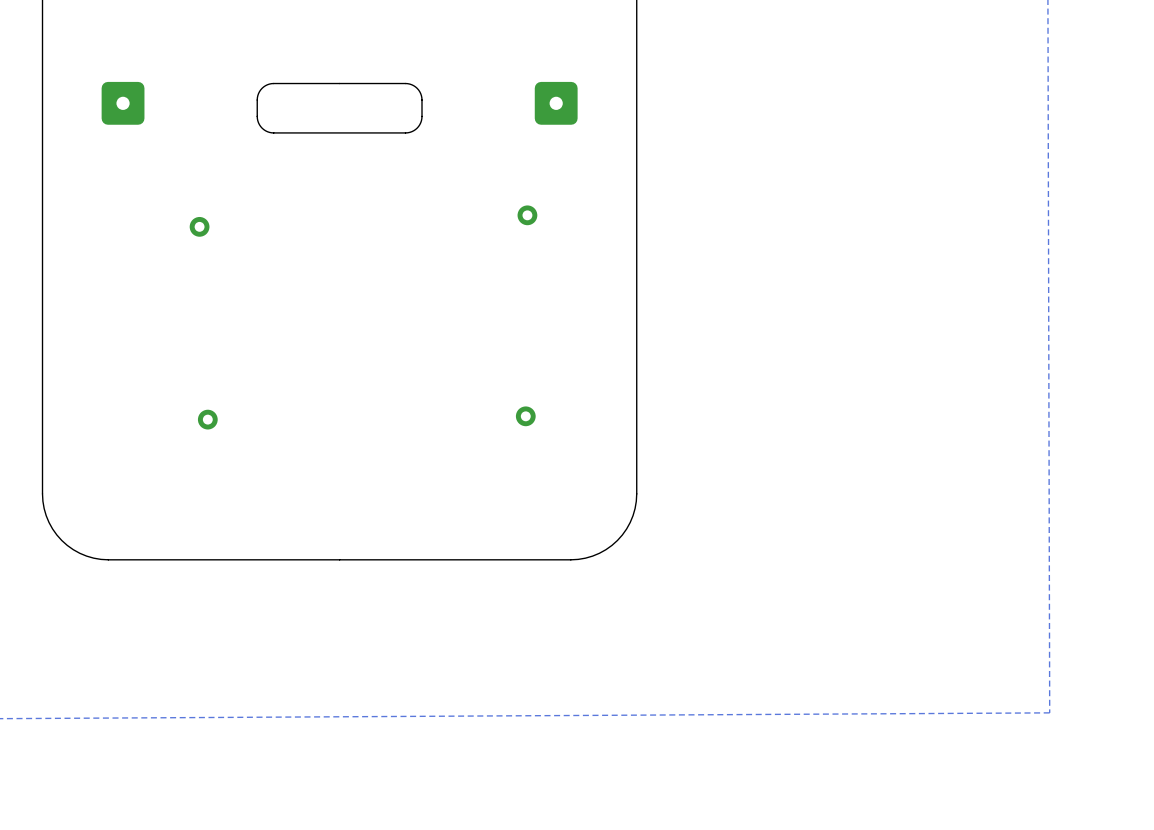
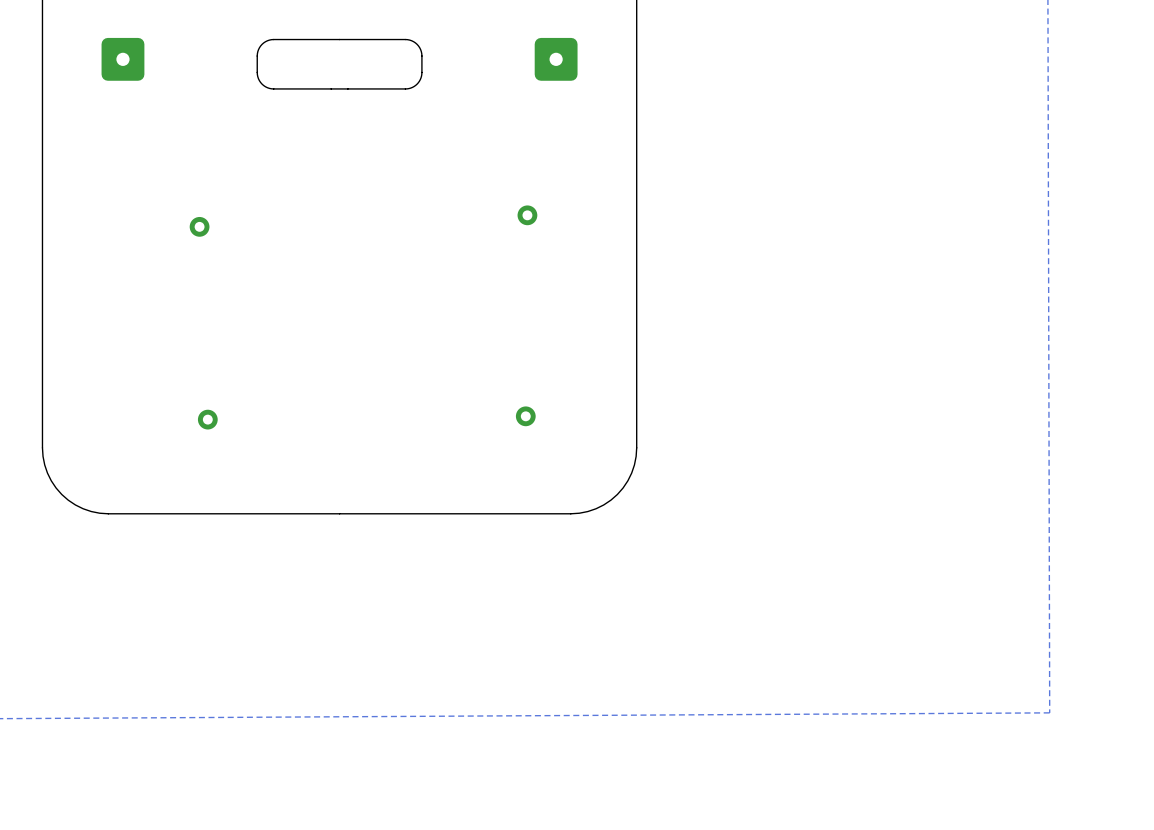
board edge: none -> (405, 39) (269, 40) (262, 44) (257, 51) (257, 76) (263, 85) (271, 88) (409, 88) (417, 84) (421, 77) (421, 53) (415, 42) (405, 39)
board edge: (405, 83) (269, 84) (262, 88) (257, 95) (257, 120) (262, 128) (271, 132) (409, 132) (417, 128) (420, 122) (421, 97) (415, 86) (405, 83) -> none
part position: (123, 103) -> (122, 59)
part position: (556, 103) -> (556, 59)
board edge: (636, 447) (636, 501) (633, 515) (626, 528) (611, 545) (599, 553) (585, 558) (570, 559) (108, 559) (93, 558) (79, 553) (67, 545) (56, 535) (49, 522) (42, 501) (42, 447) -> (636, 447) (631, 473) (617, 494) (596, 508) (570, 513) (99, 513) (75, 504) (56, 488) (44, 464) (42, 447)

